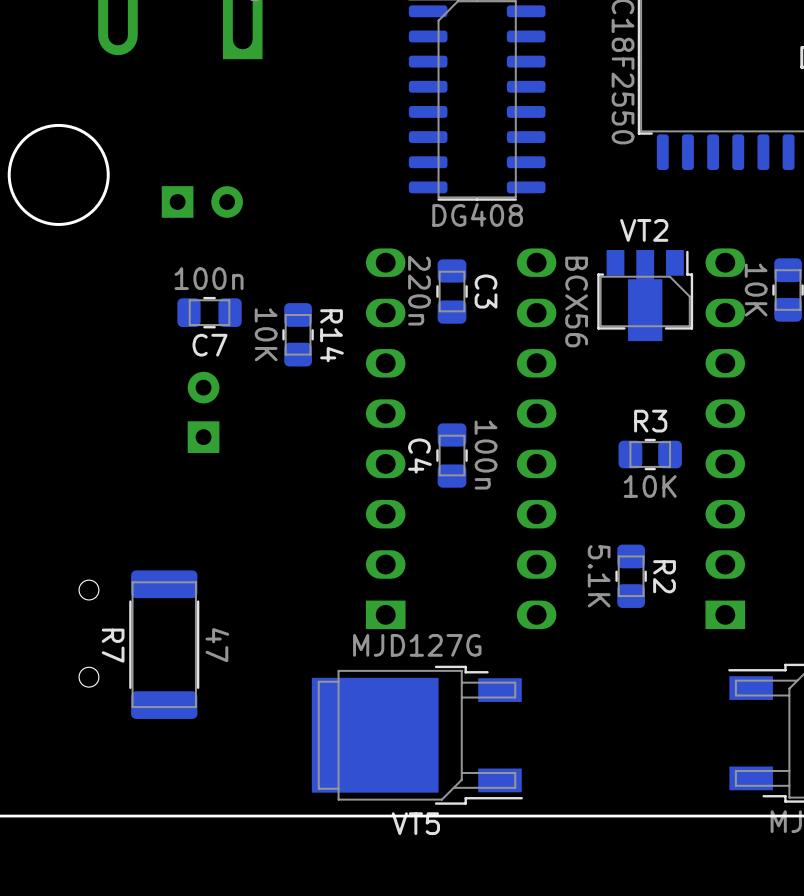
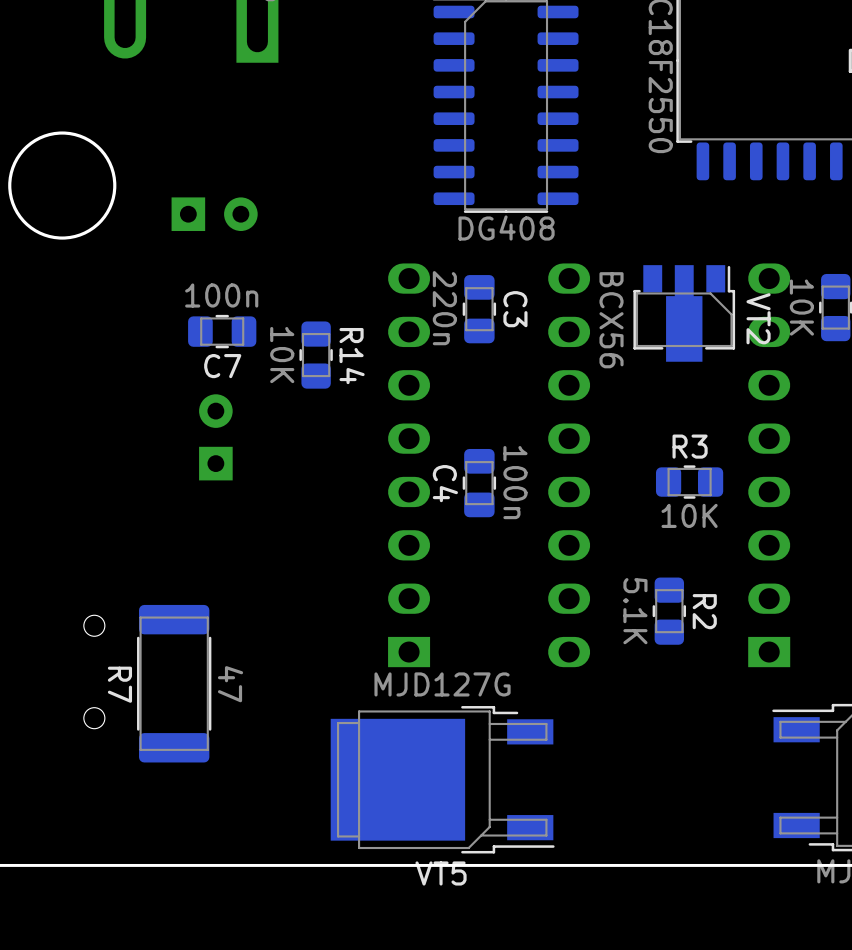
VT2 name rotation: 0° (644, 230) -> 90° clockwise (758, 318)
VT2 name position: VT2 (644, 230) -> VT2 (758, 318)

